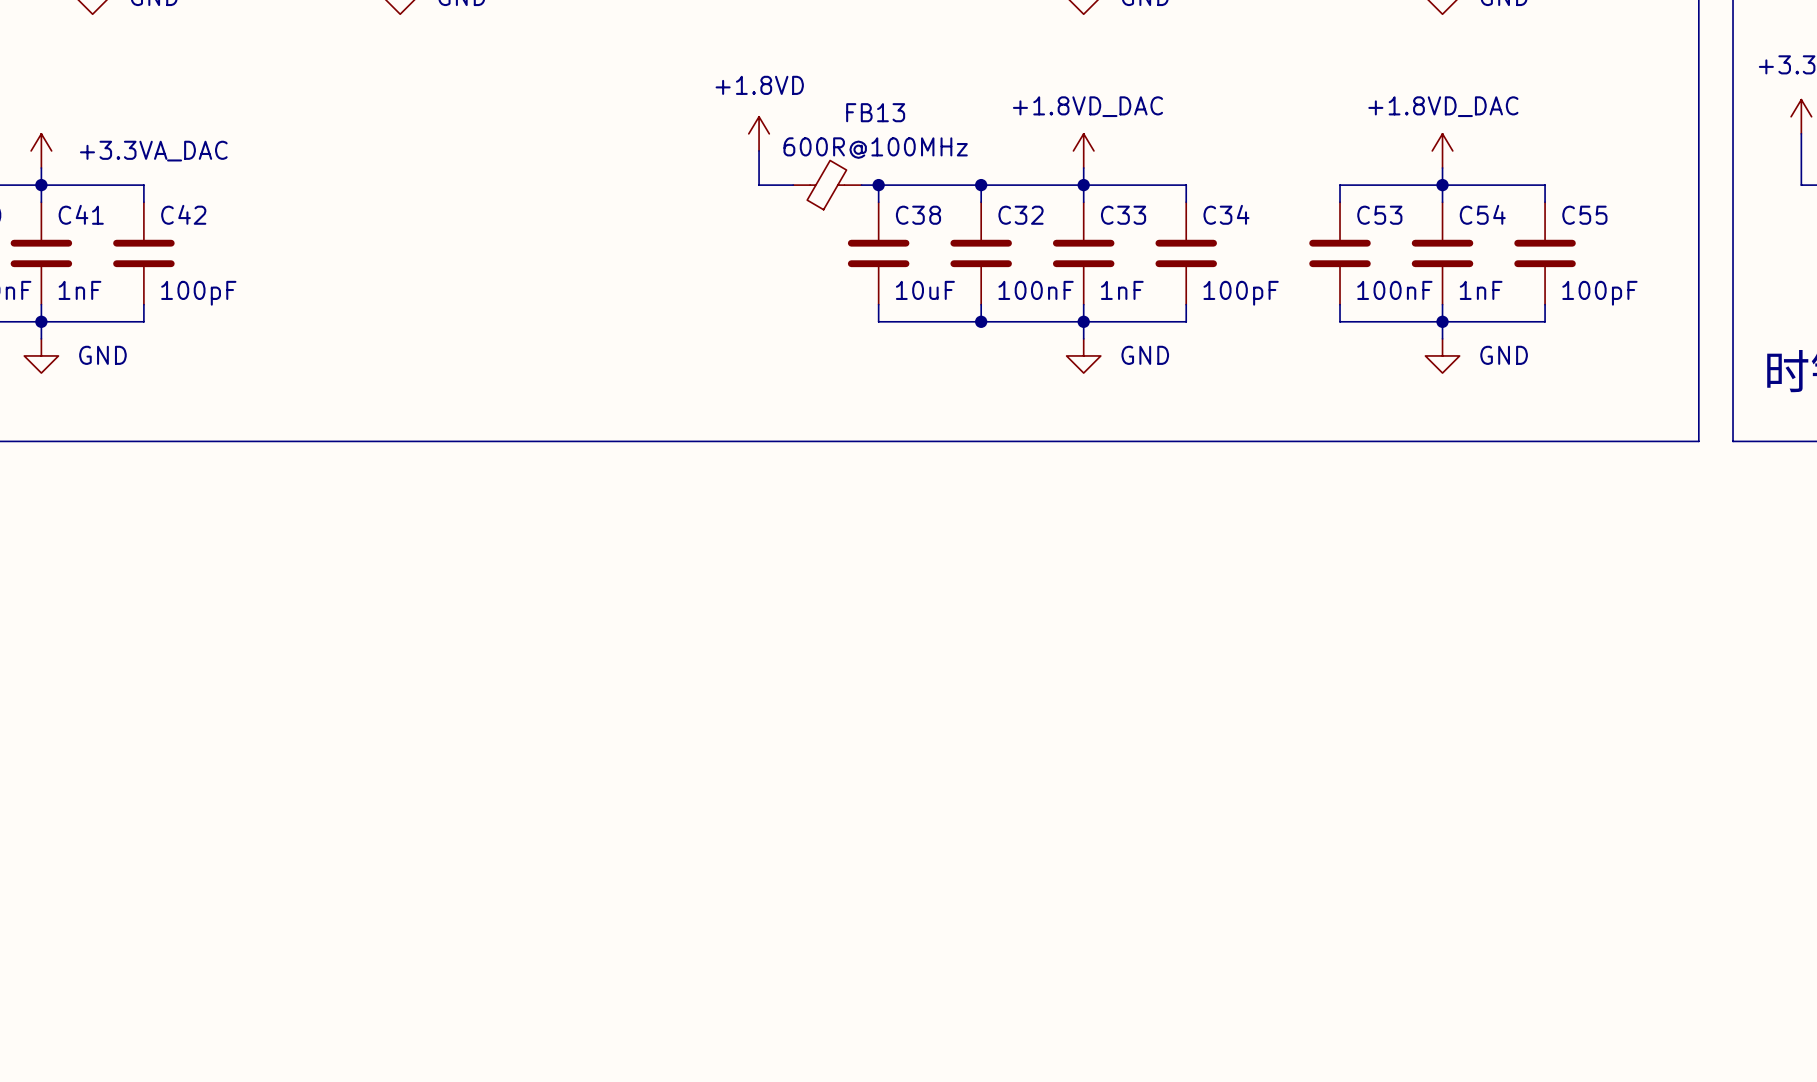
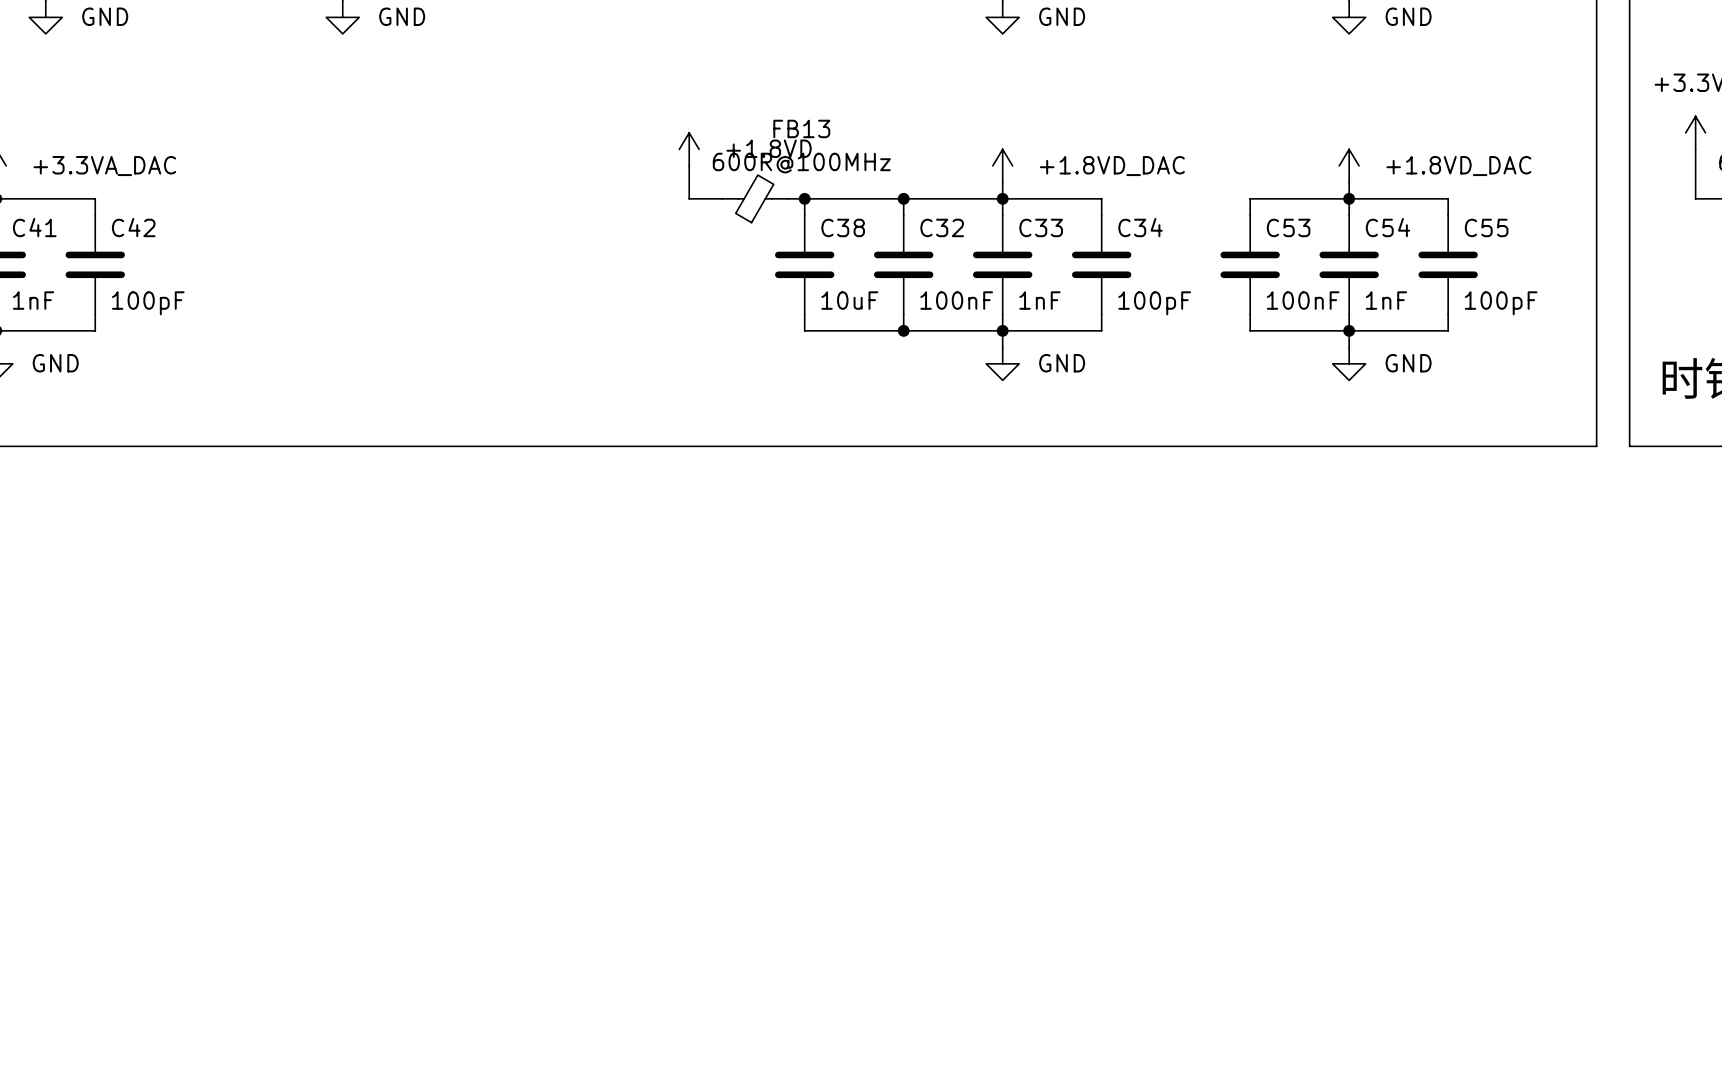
power symbol text position: +1.8VD (759, 85) -> +1.8VD (769, 148)
power symbol text position: +1.8VD_DAC (1087, 106) -> +1.8VD_DAC (1112, 166)
power symbol text position: +1.8VD_DAC (1443, 106) -> +1.8VD_DAC (1458, 166)

